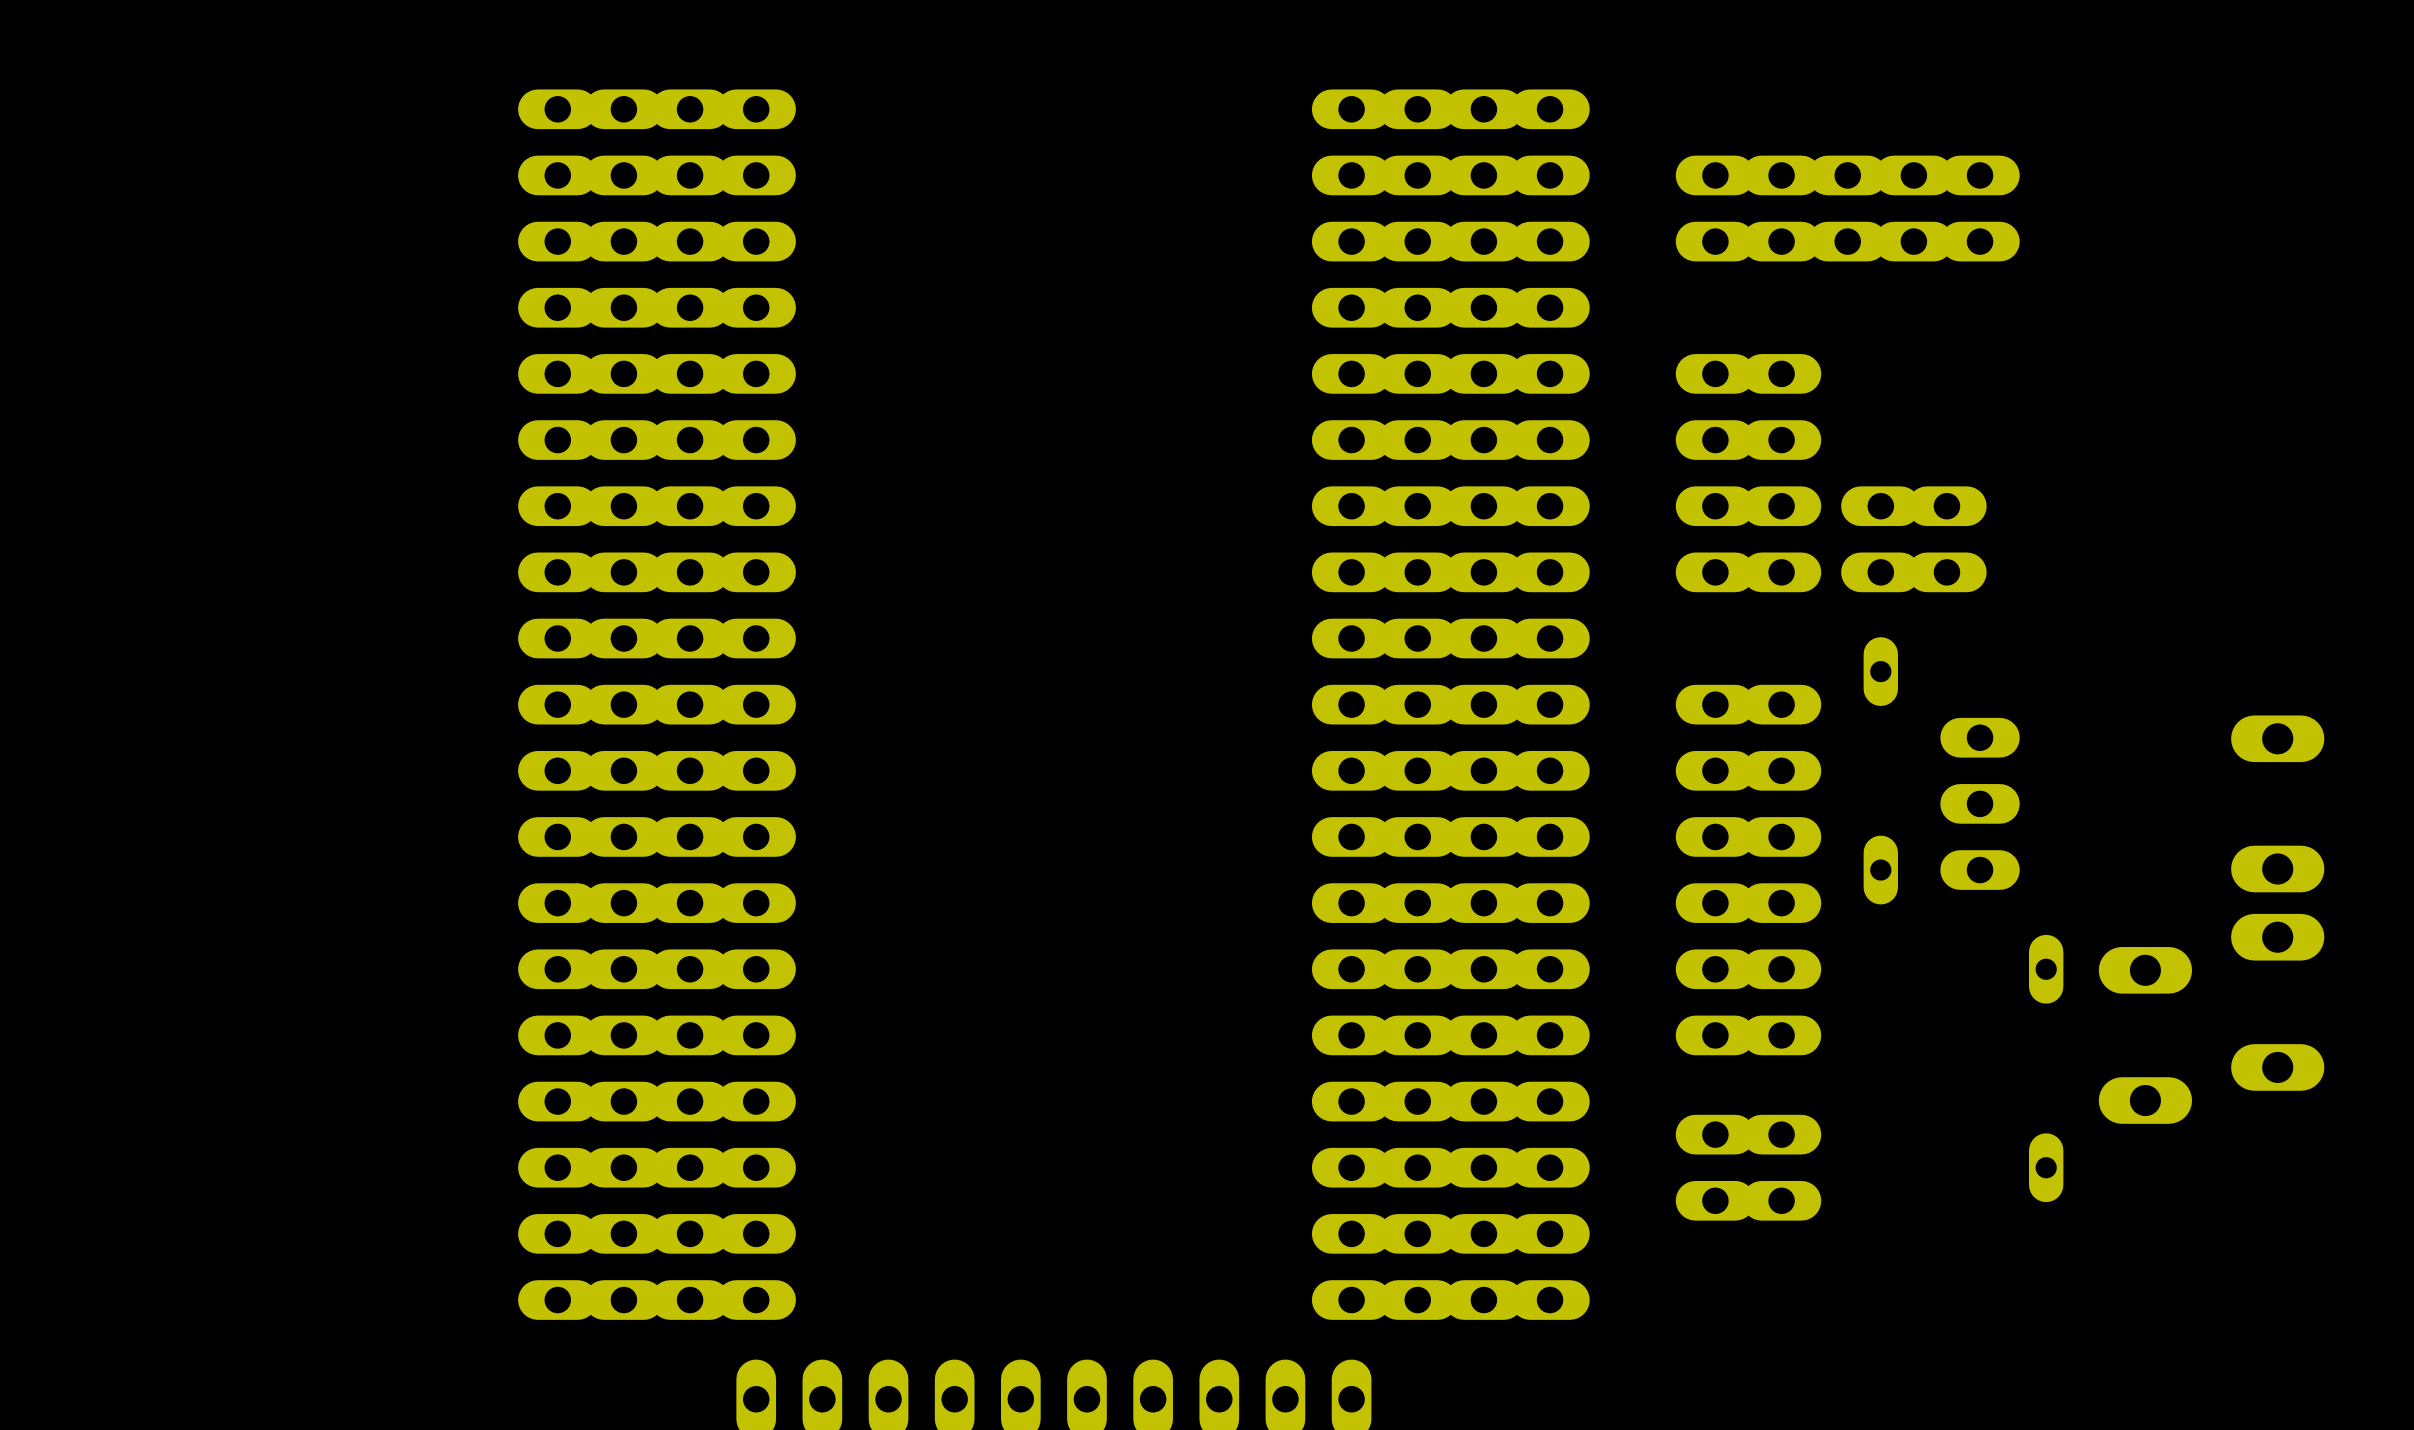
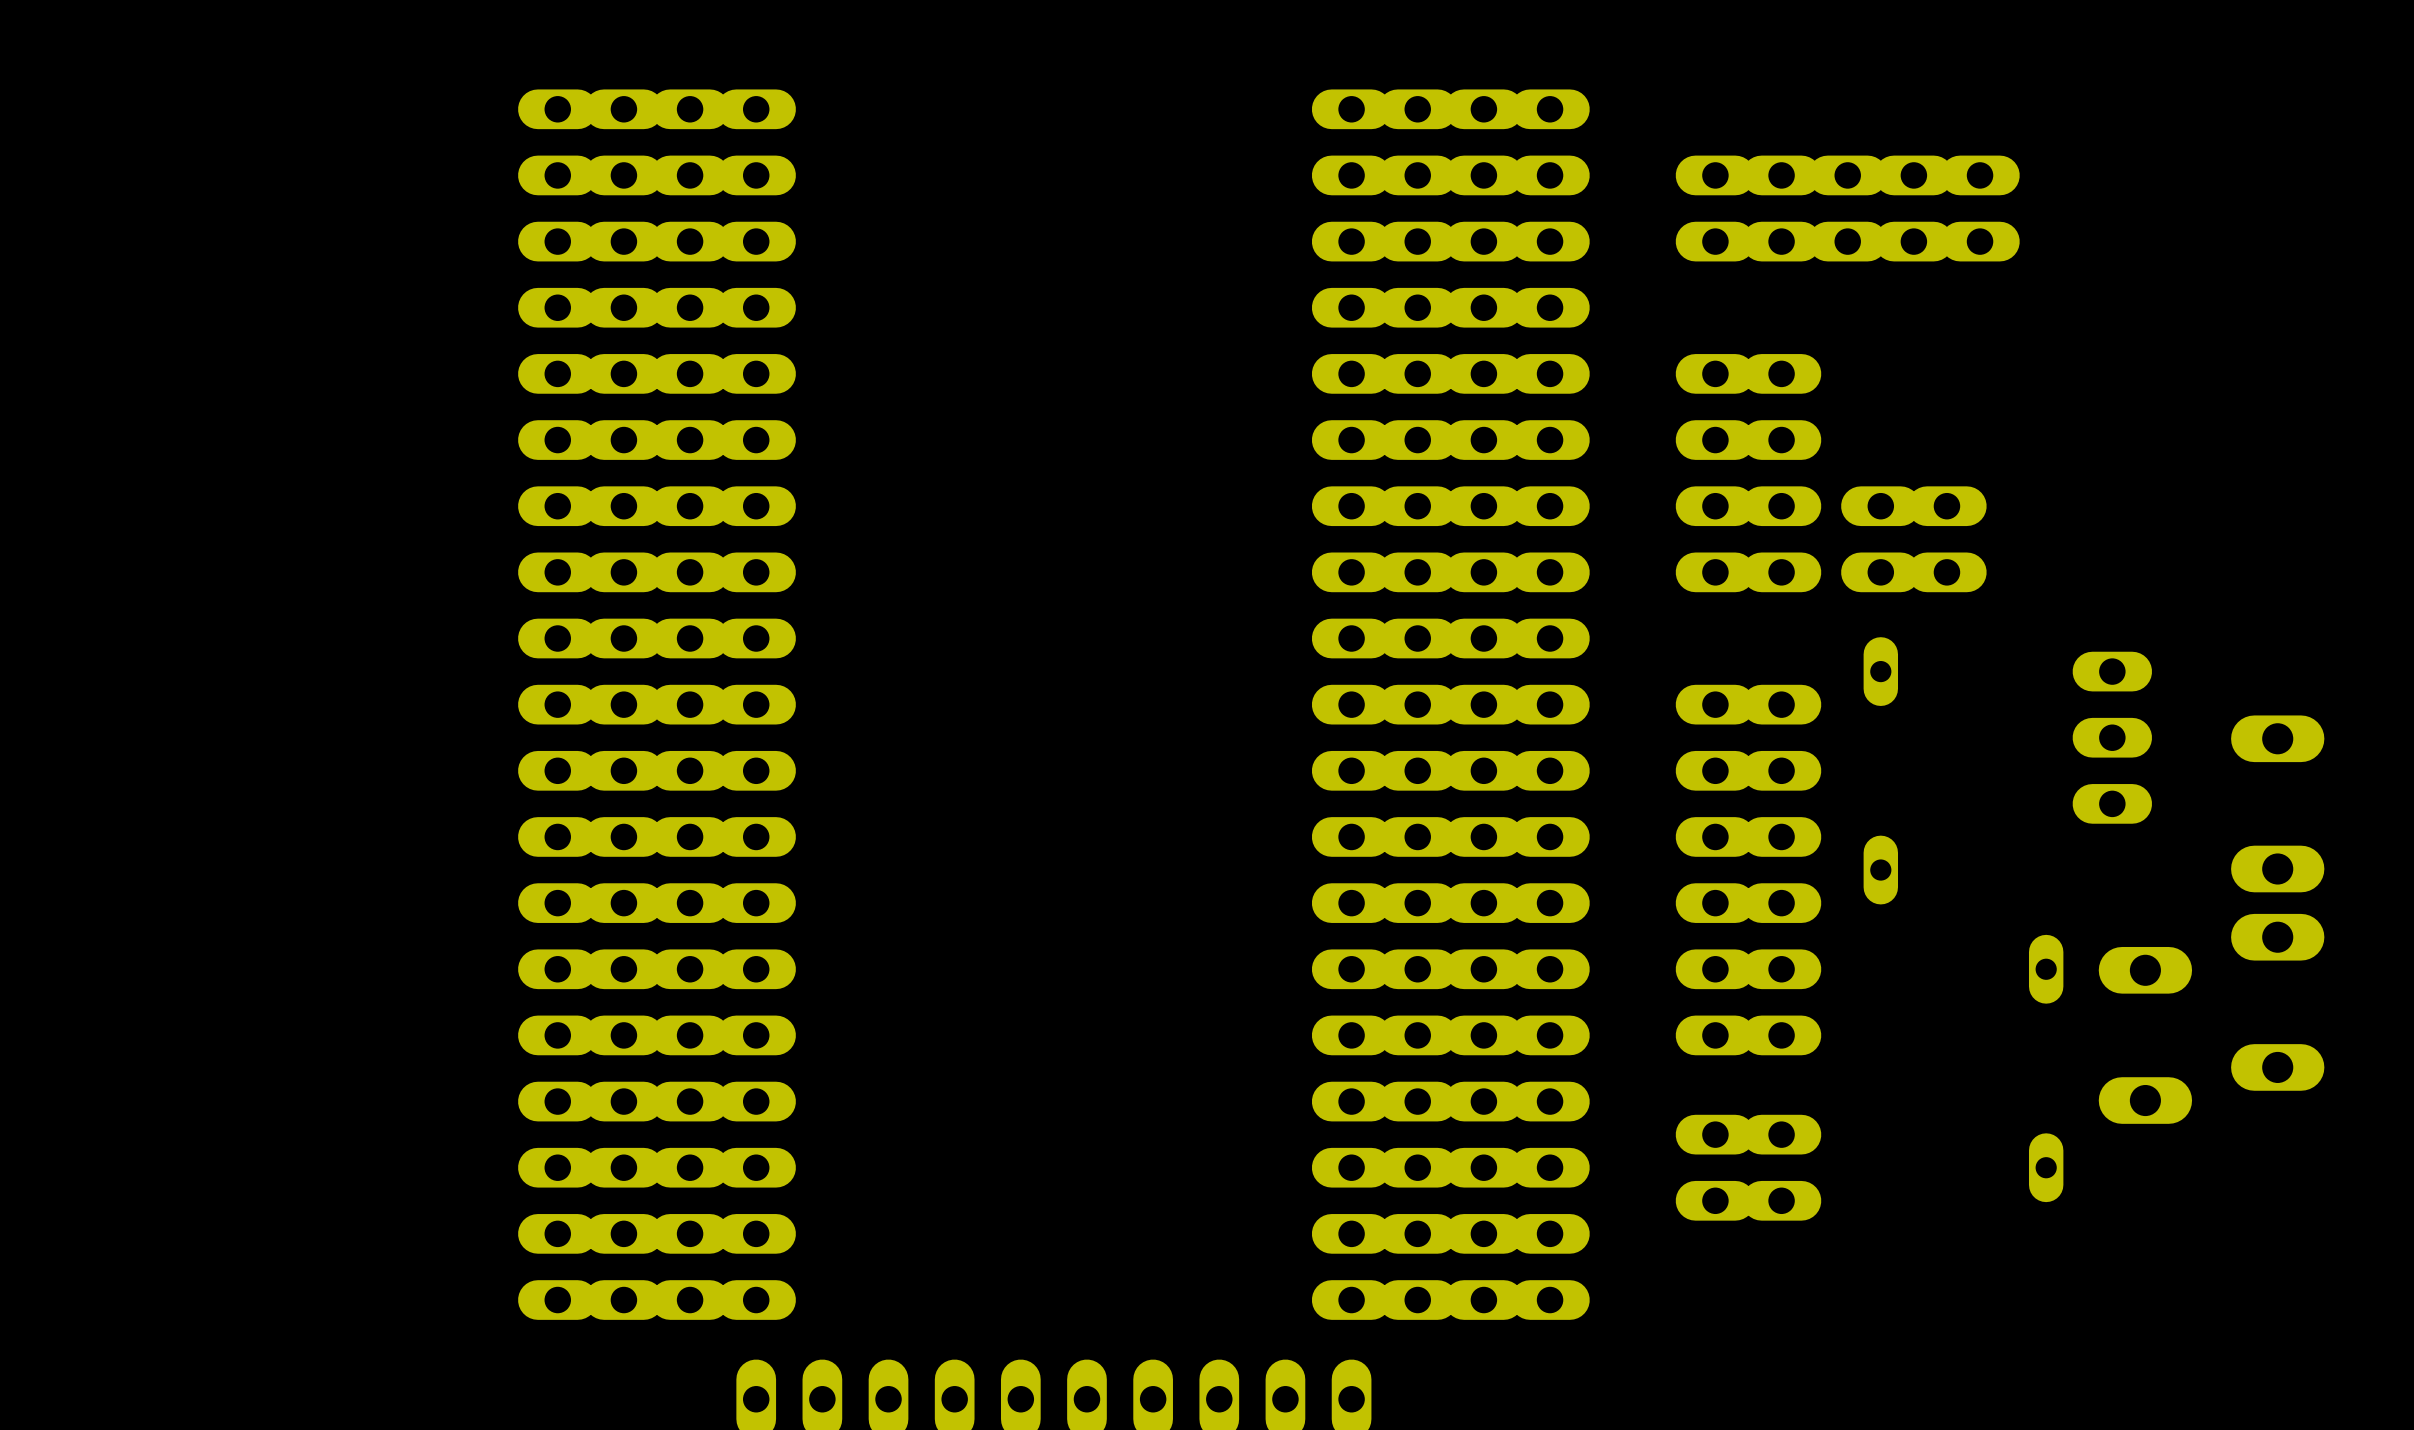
part position: (1980, 803) -> (2112, 737)

